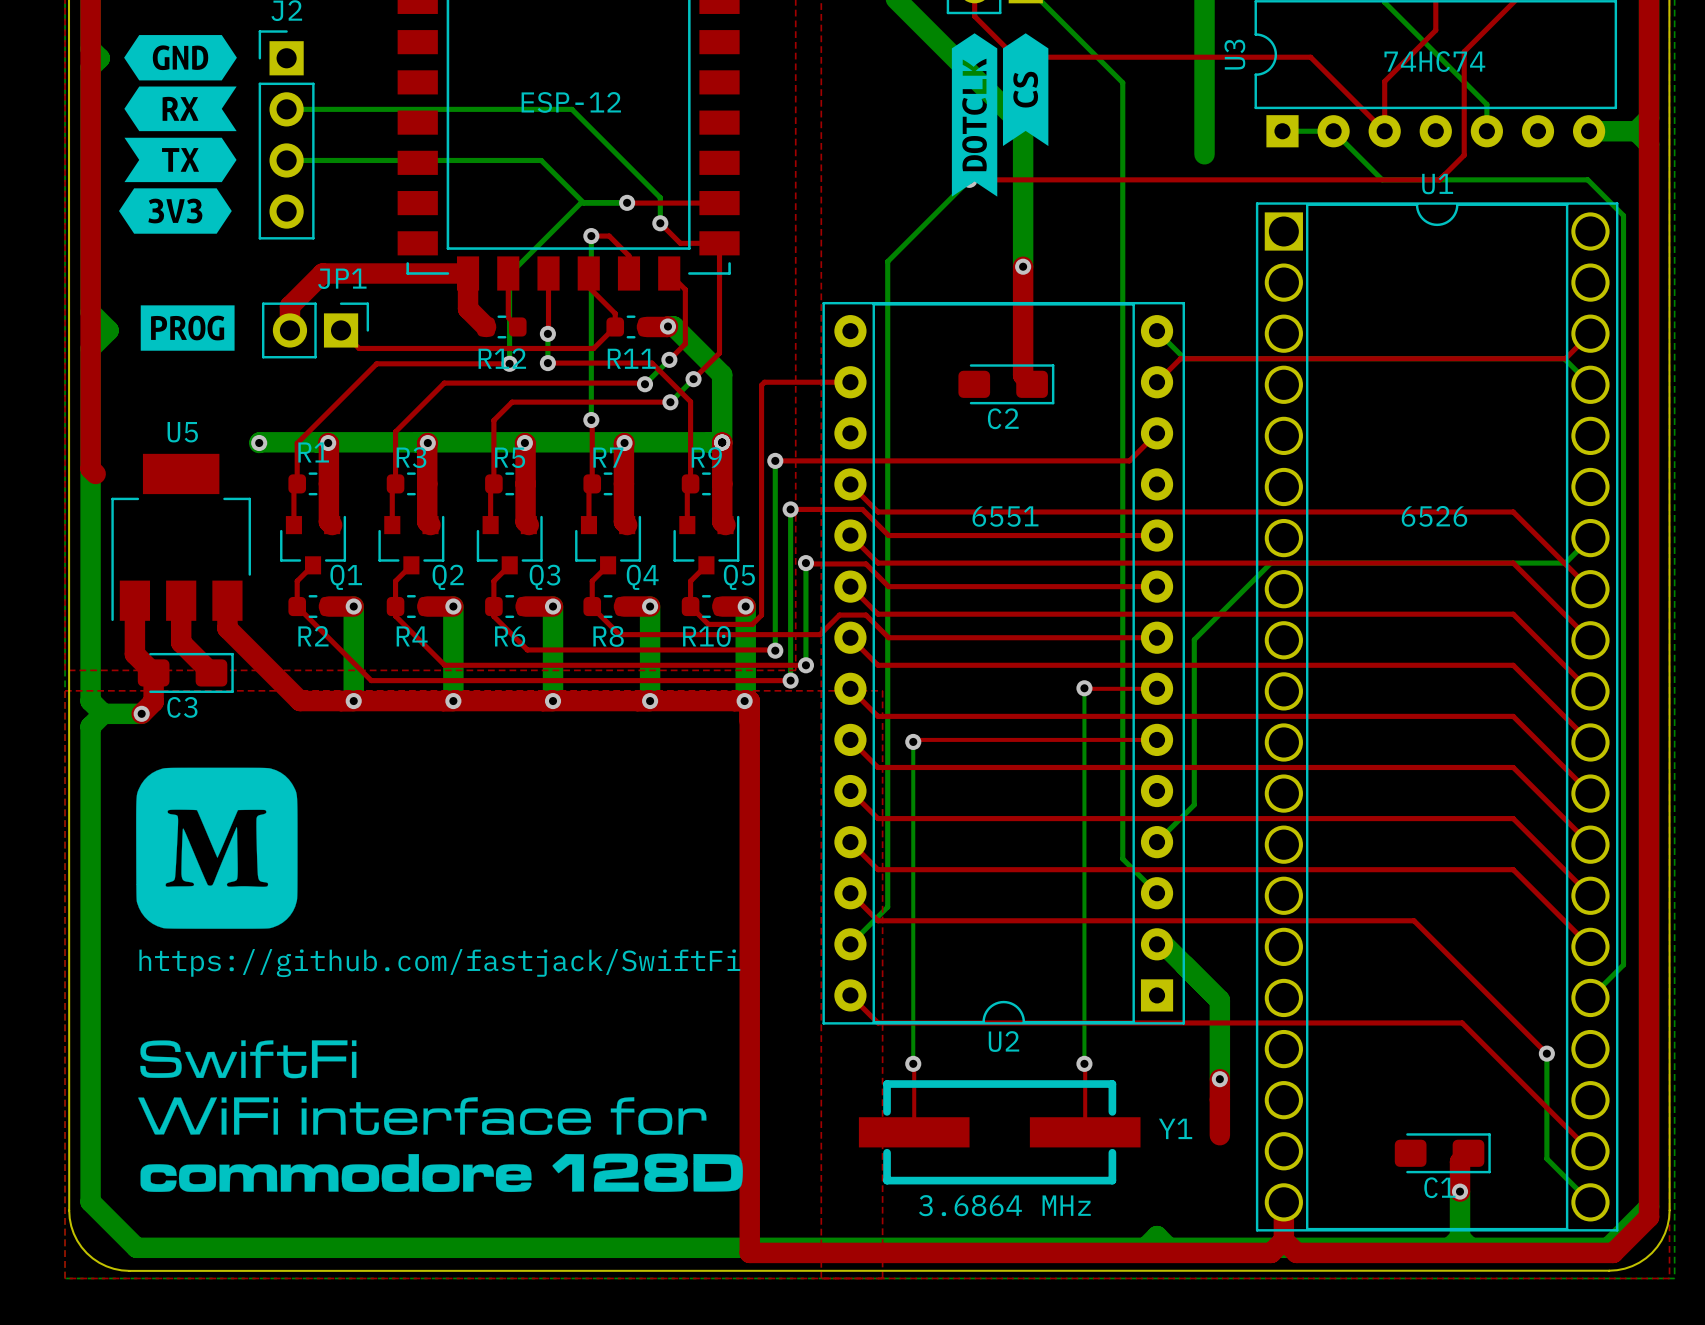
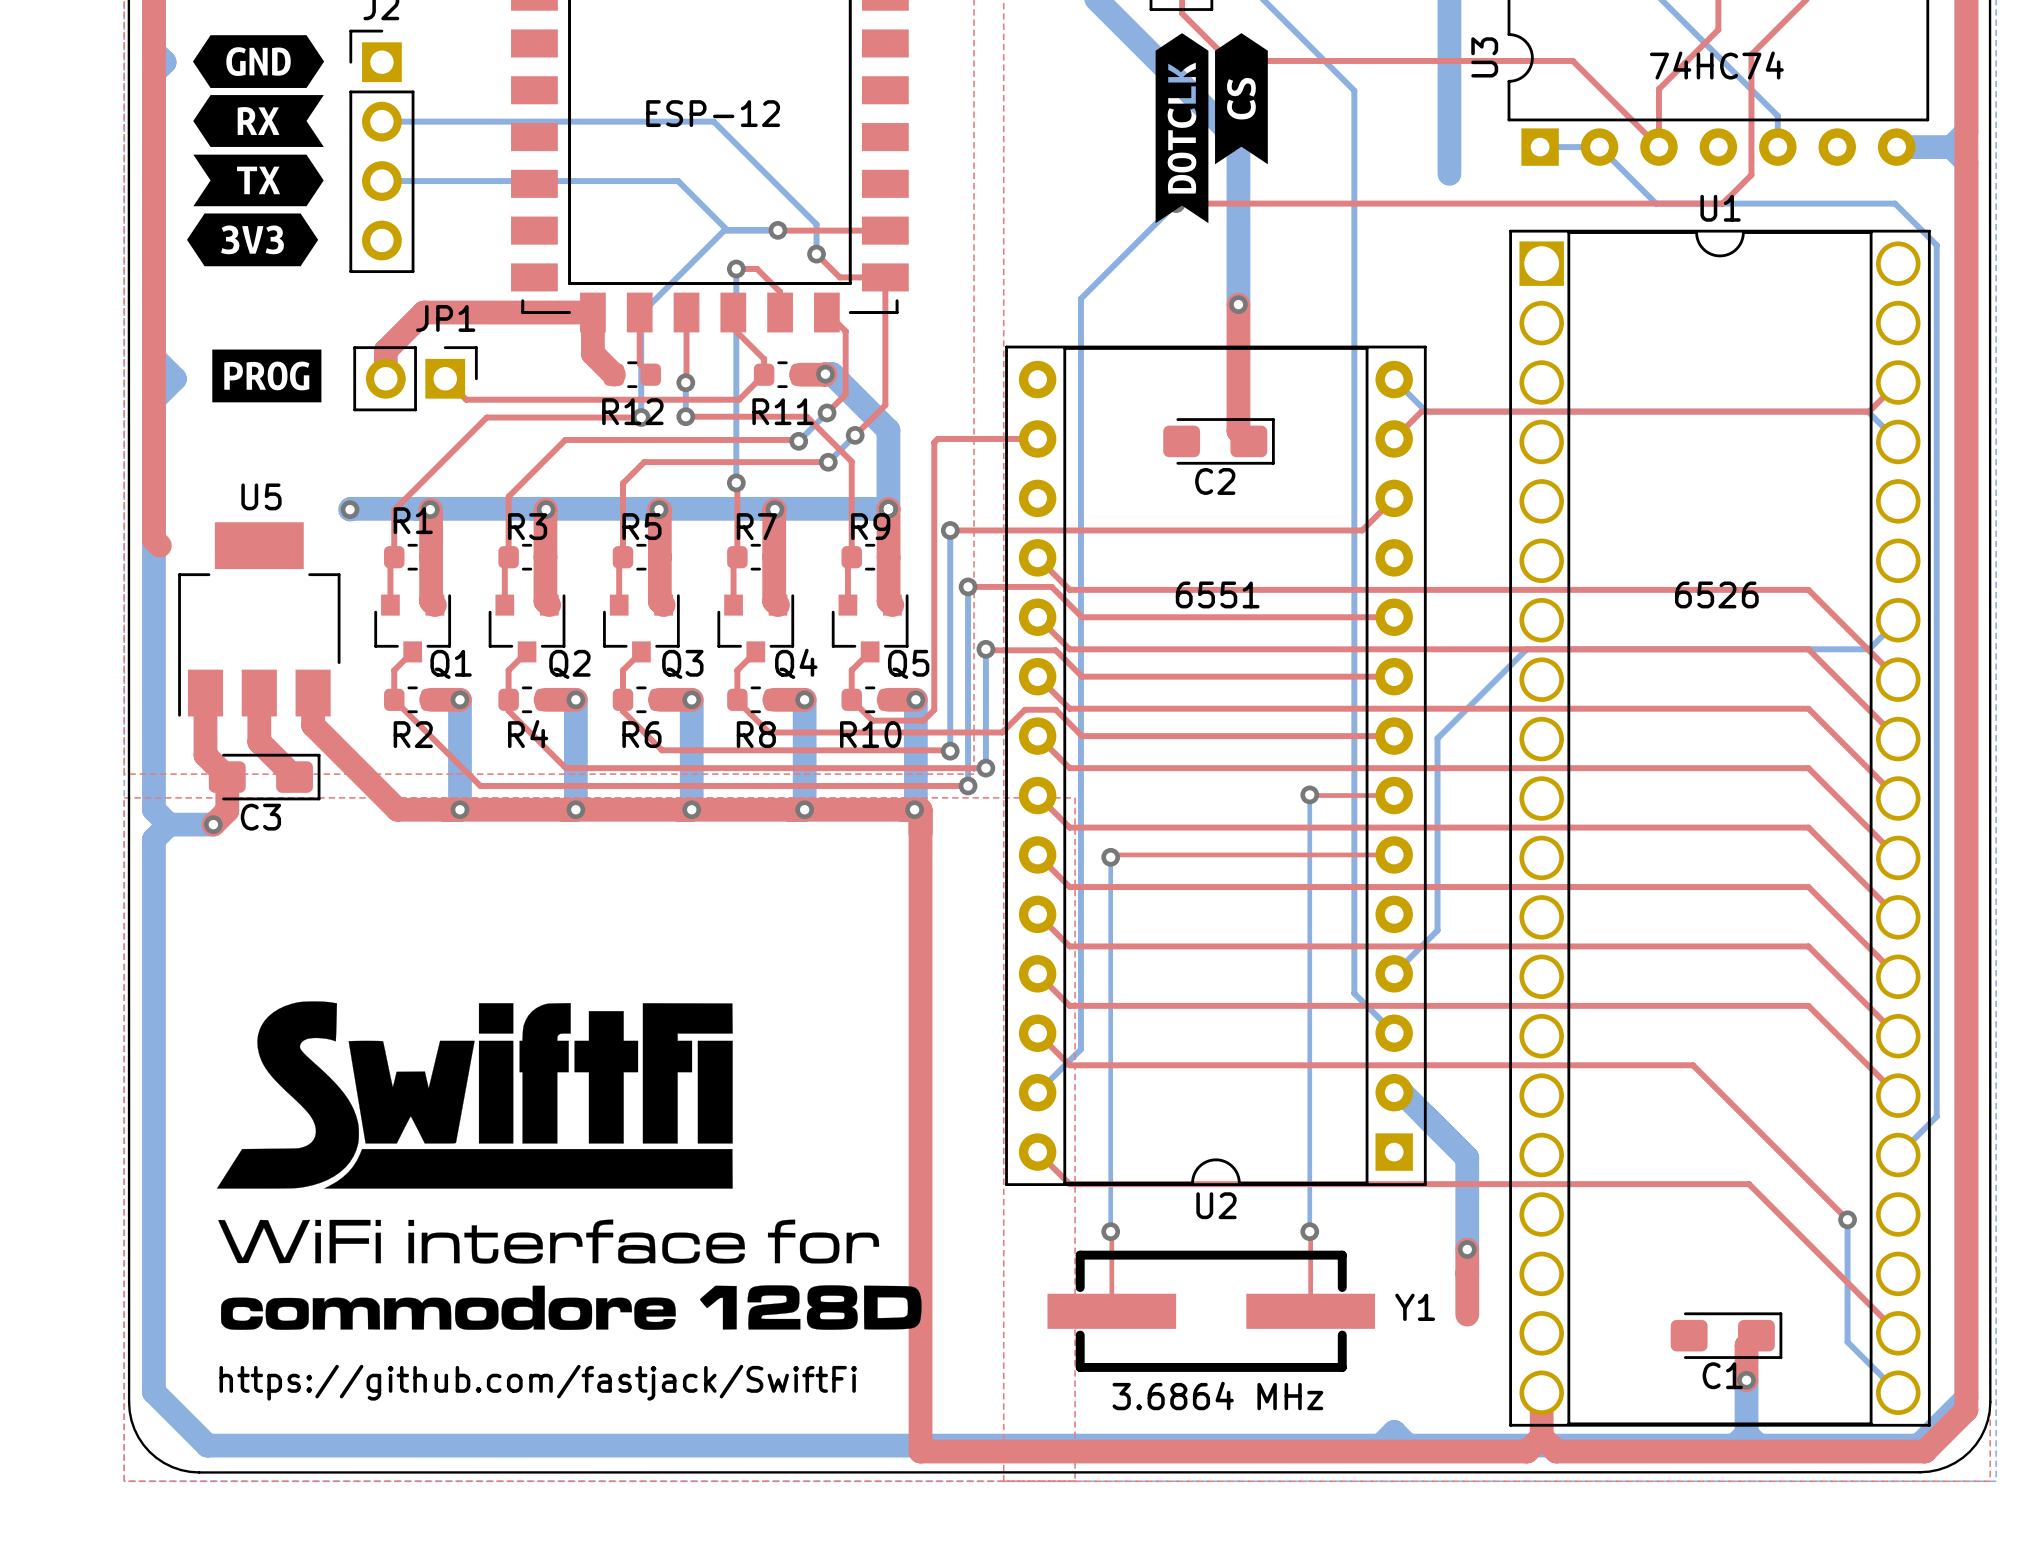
drawing: [136, 767, 298, 929] -> none
drawing: none -> [216, 1001, 733, 1189]
text position: https://github.com/fastjack/SwiftFi (439, 963) -> https://github.com/fastjack/SwiftFi (538, 1382)
drawing shape: [138, 1040, 743, 1193] -> [218, 1219, 922, 1330]

